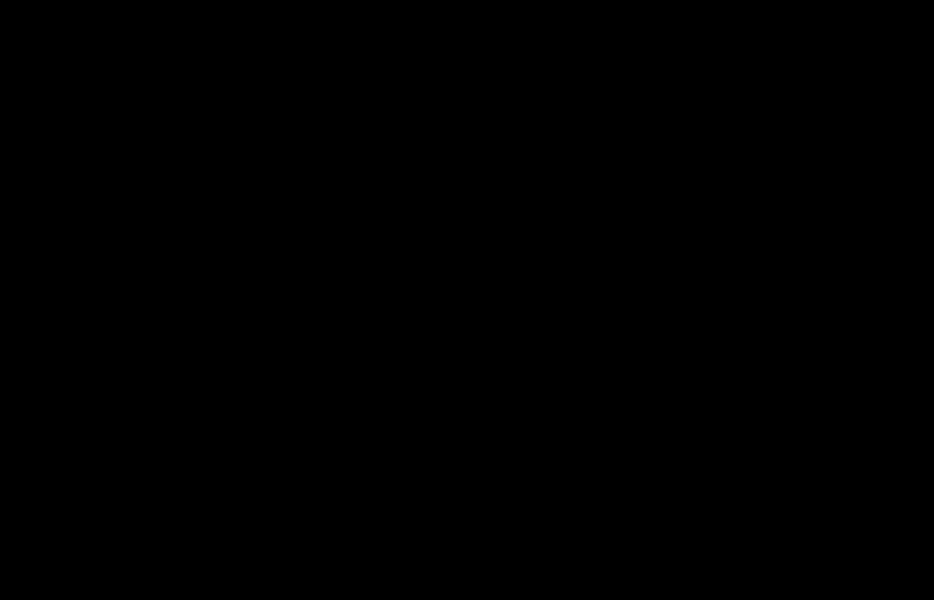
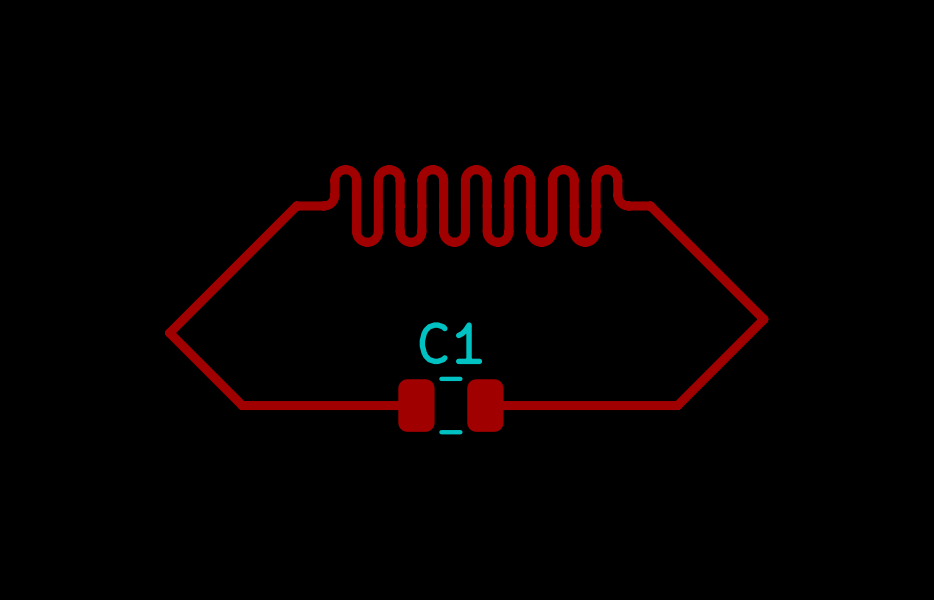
top track: none -> (416, 405) (242, 405) (169, 332) (296, 205) (325, 205) (331, 202) (334, 196) (335, 176) (339, 171) (345, 169) (352, 171) (356, 179) (356, 234) (360, 240) (367, 242) (374, 240) (377, 234) (378, 179) (381, 172) (386, 170) (393, 170) (399, 176) (400, 232) (404, 240) (410, 242) (417, 240) (421, 234) (421, 179) (428, 170) (436, 170) (442, 176) (443, 232) (447, 240) (454, 242) (461, 240) (465, 234) (465, 179) (472, 170) (480, 170) (486, 176) (487, 232) (491, 240) (498, 242) (504, 240) (508, 234) (509, 179) (514, 171) (522, 170) (529, 176) (530, 232) (533, 239) (541, 242) (548, 240) (552, 232) (553, 176) (561, 169) (571, 172) (574, 180) (574, 234) (578, 240) (585, 242) (591, 240) (595, 232) (596, 176) (602, 170) (611, 170) (617, 177) (617, 196) (621, 202) (627, 205) (650, 205) (763, 319) (677, 405) (485, 405)
C1: none -> (450, 405)

